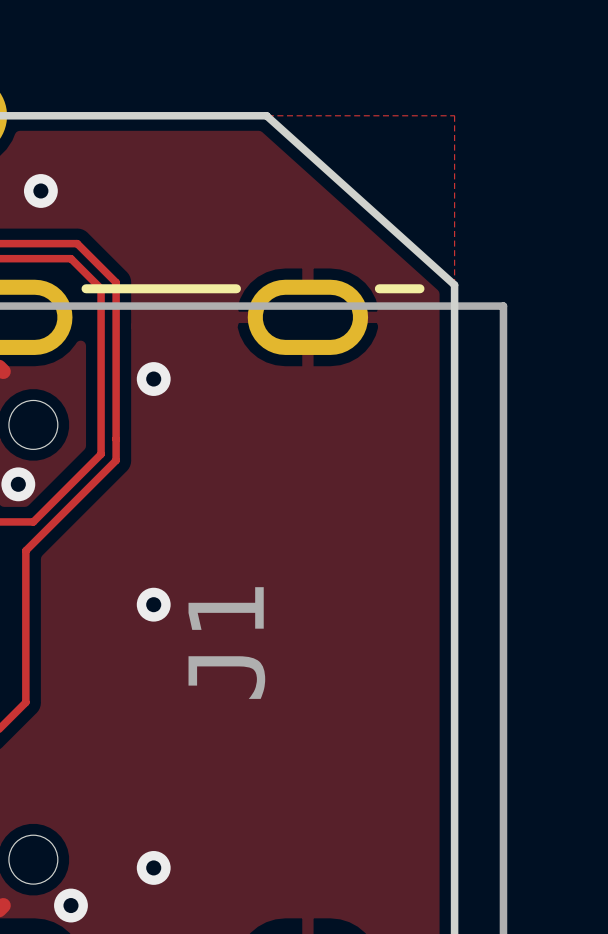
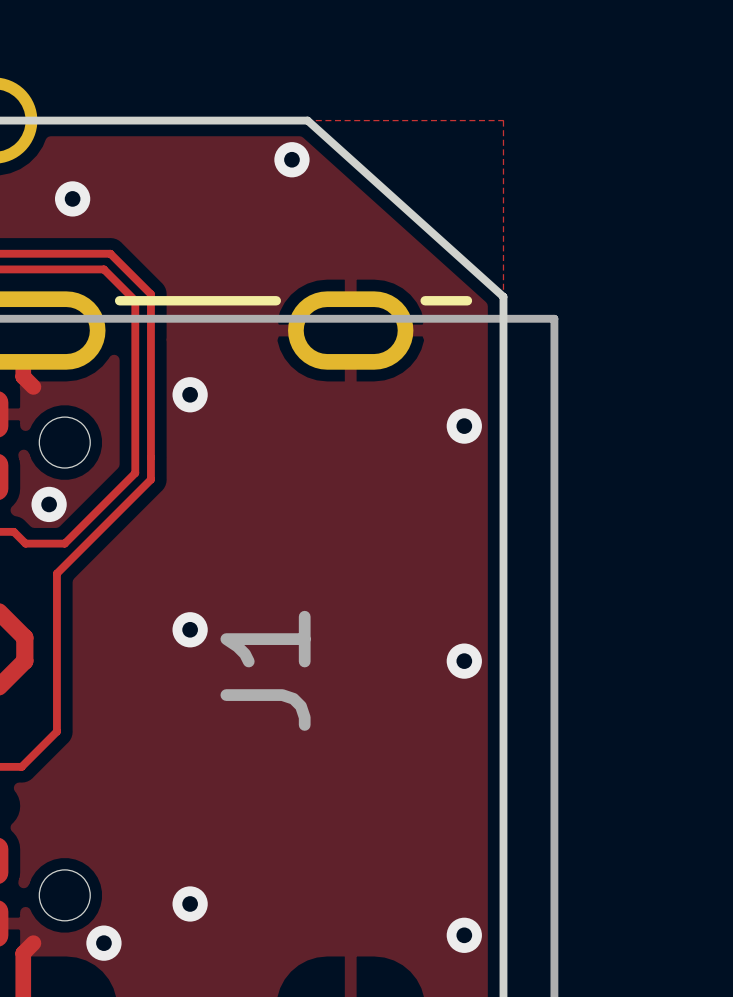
via: none -> (291, 159)
via: none -> (464, 426)
via: none -> (464, 661)
via: none -> (464, 935)

